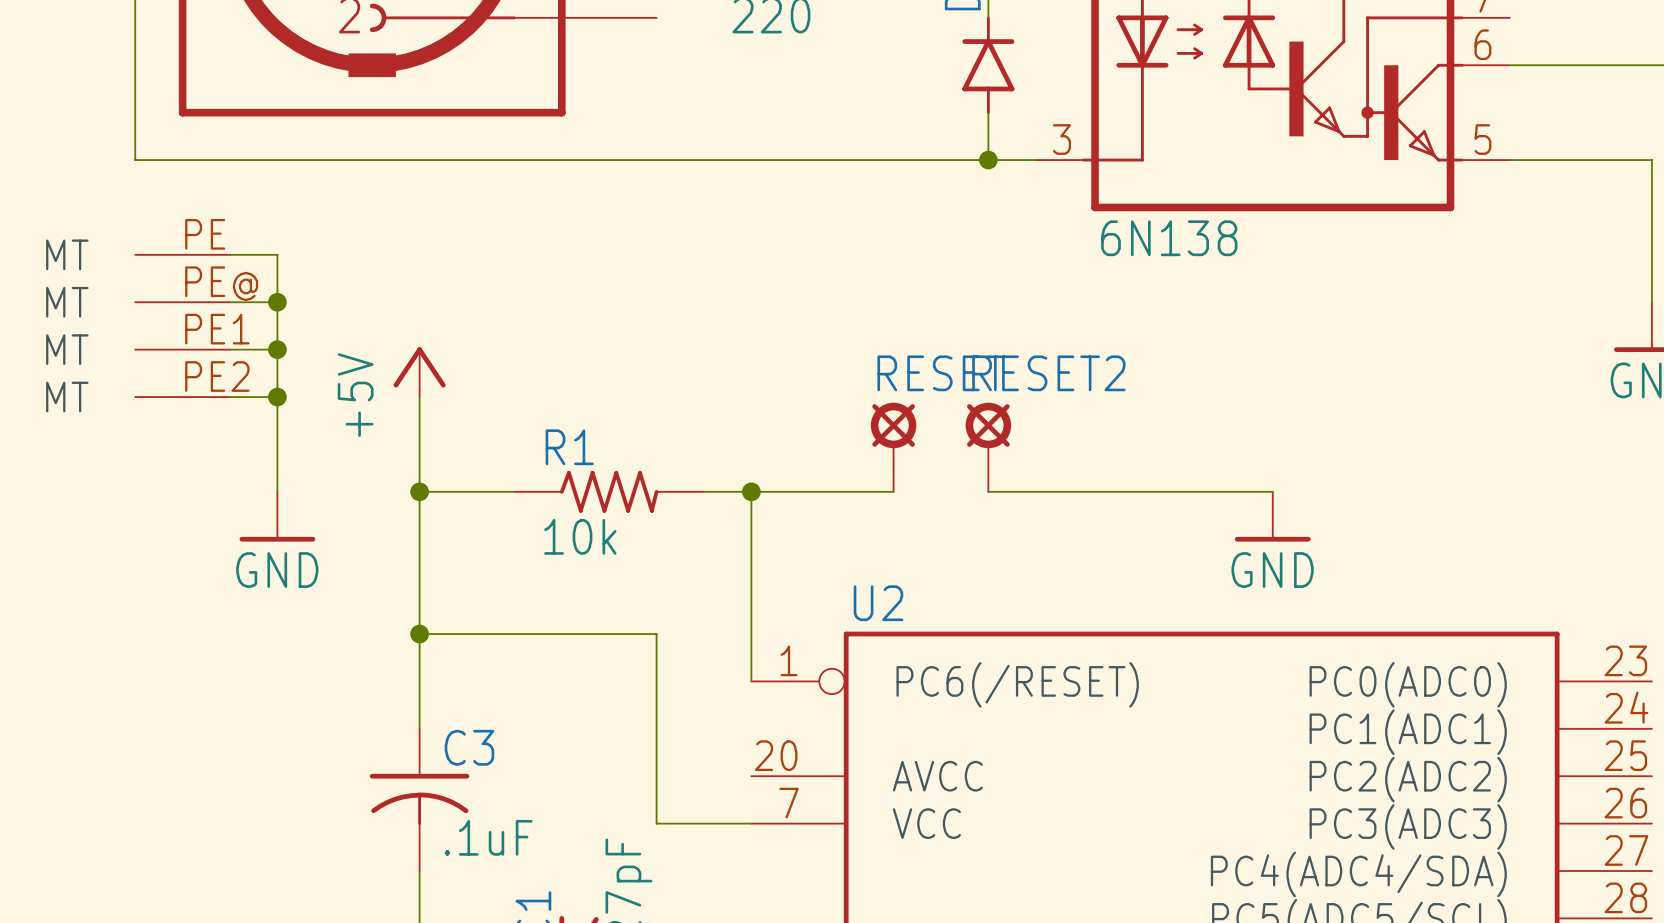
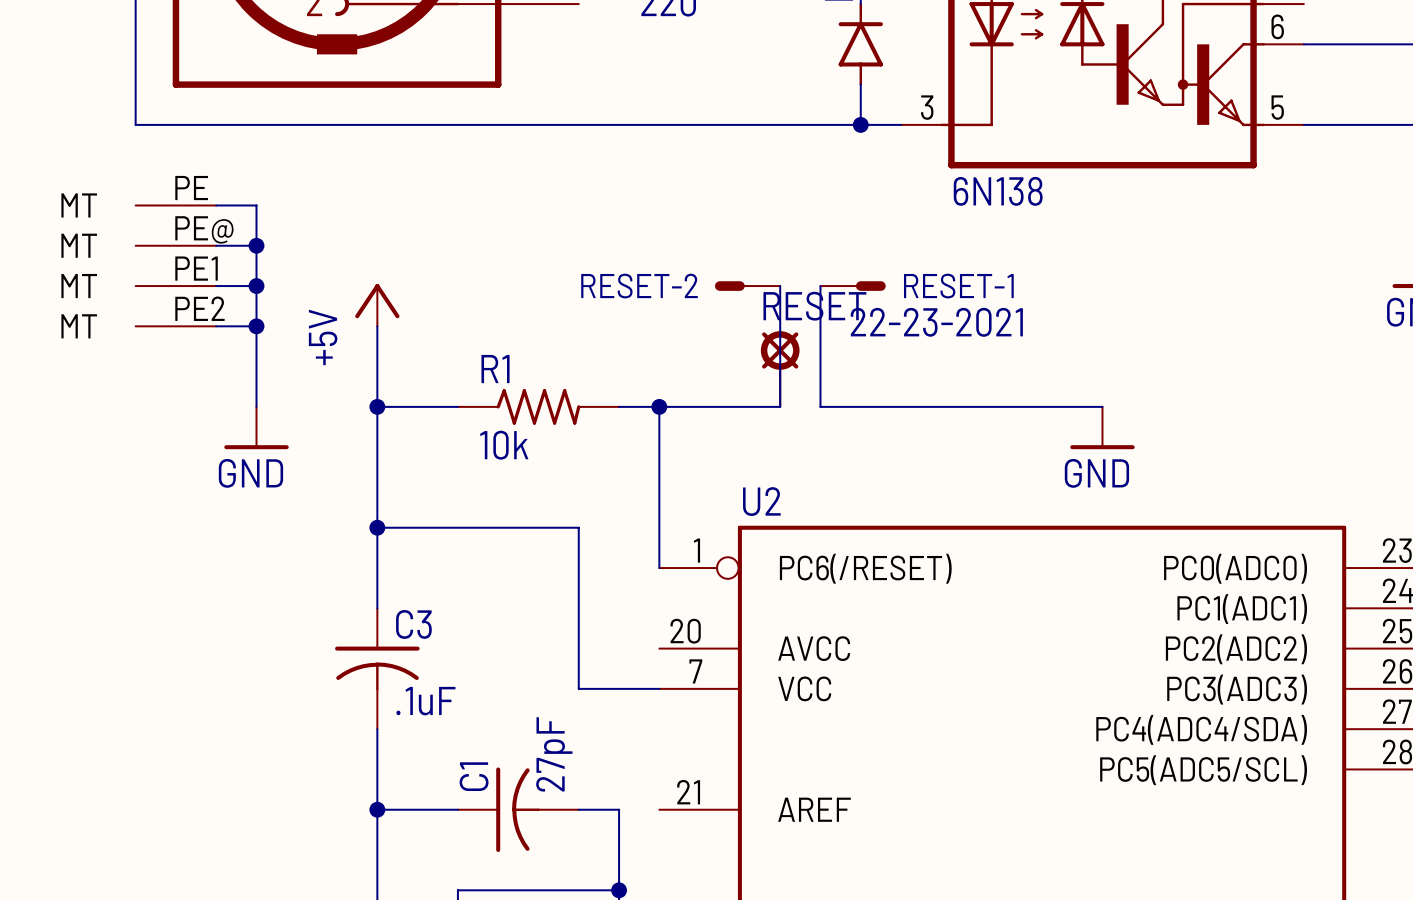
RESET-2: none -> (747, 286)
wire: none -> (780, 286) (780, 406)
wire: none -> (820, 286) (820, 406) (860, 406)
RESET-1: none -> 22-23-2021 (853, 286)
RESET2: (988, 447) -> none

